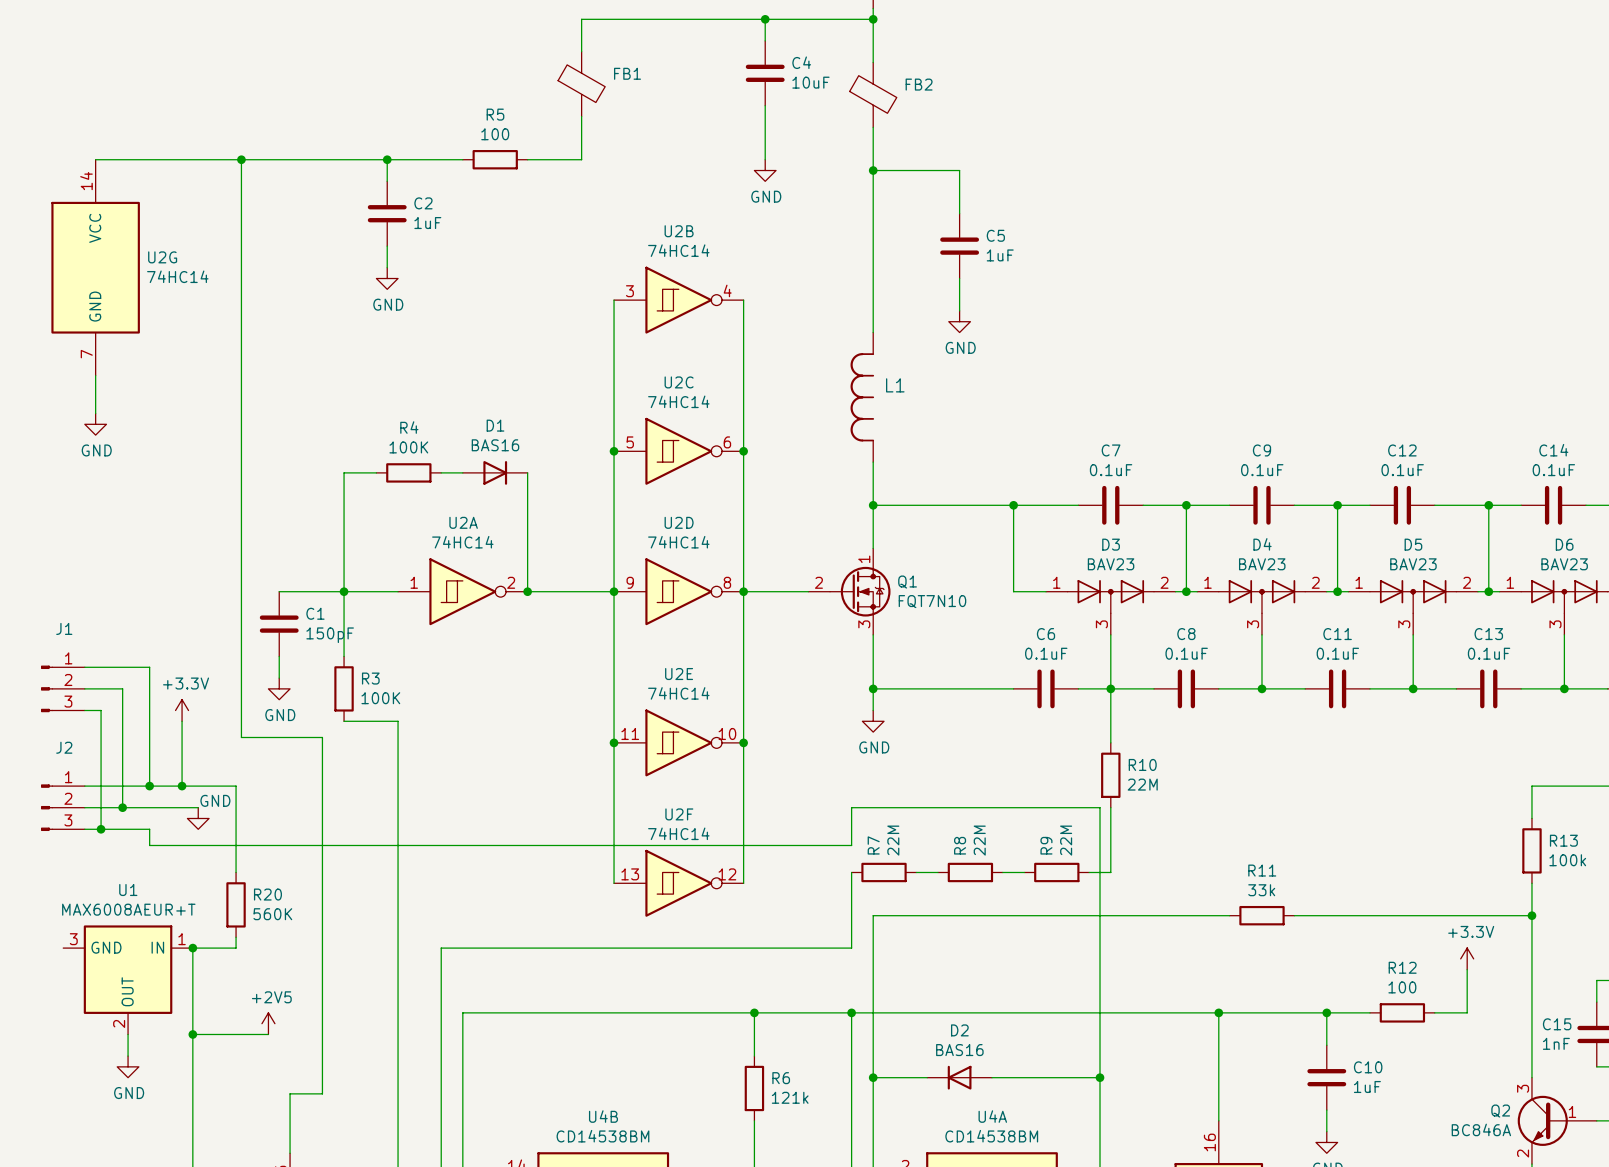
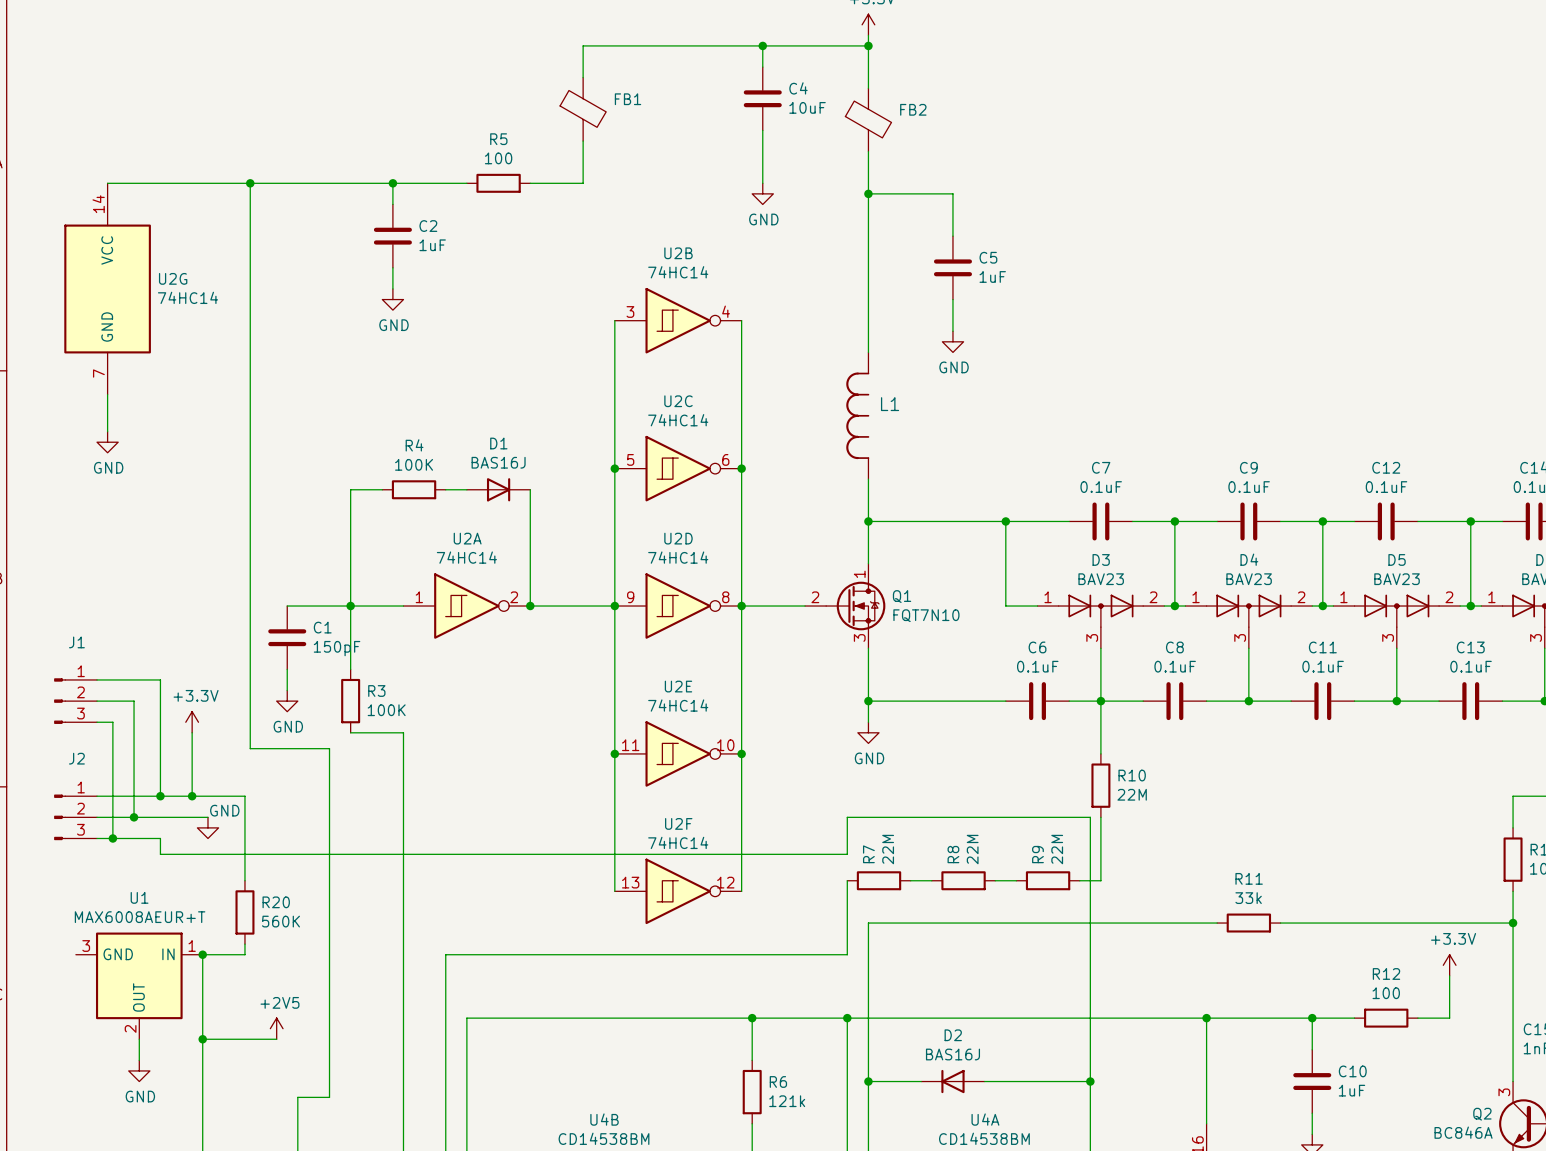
D1 value: BAS16 (495, 445) -> BAS16J (498, 462)
D2 value: BAS16 (959, 1050) -> BAS16J (952, 1054)

